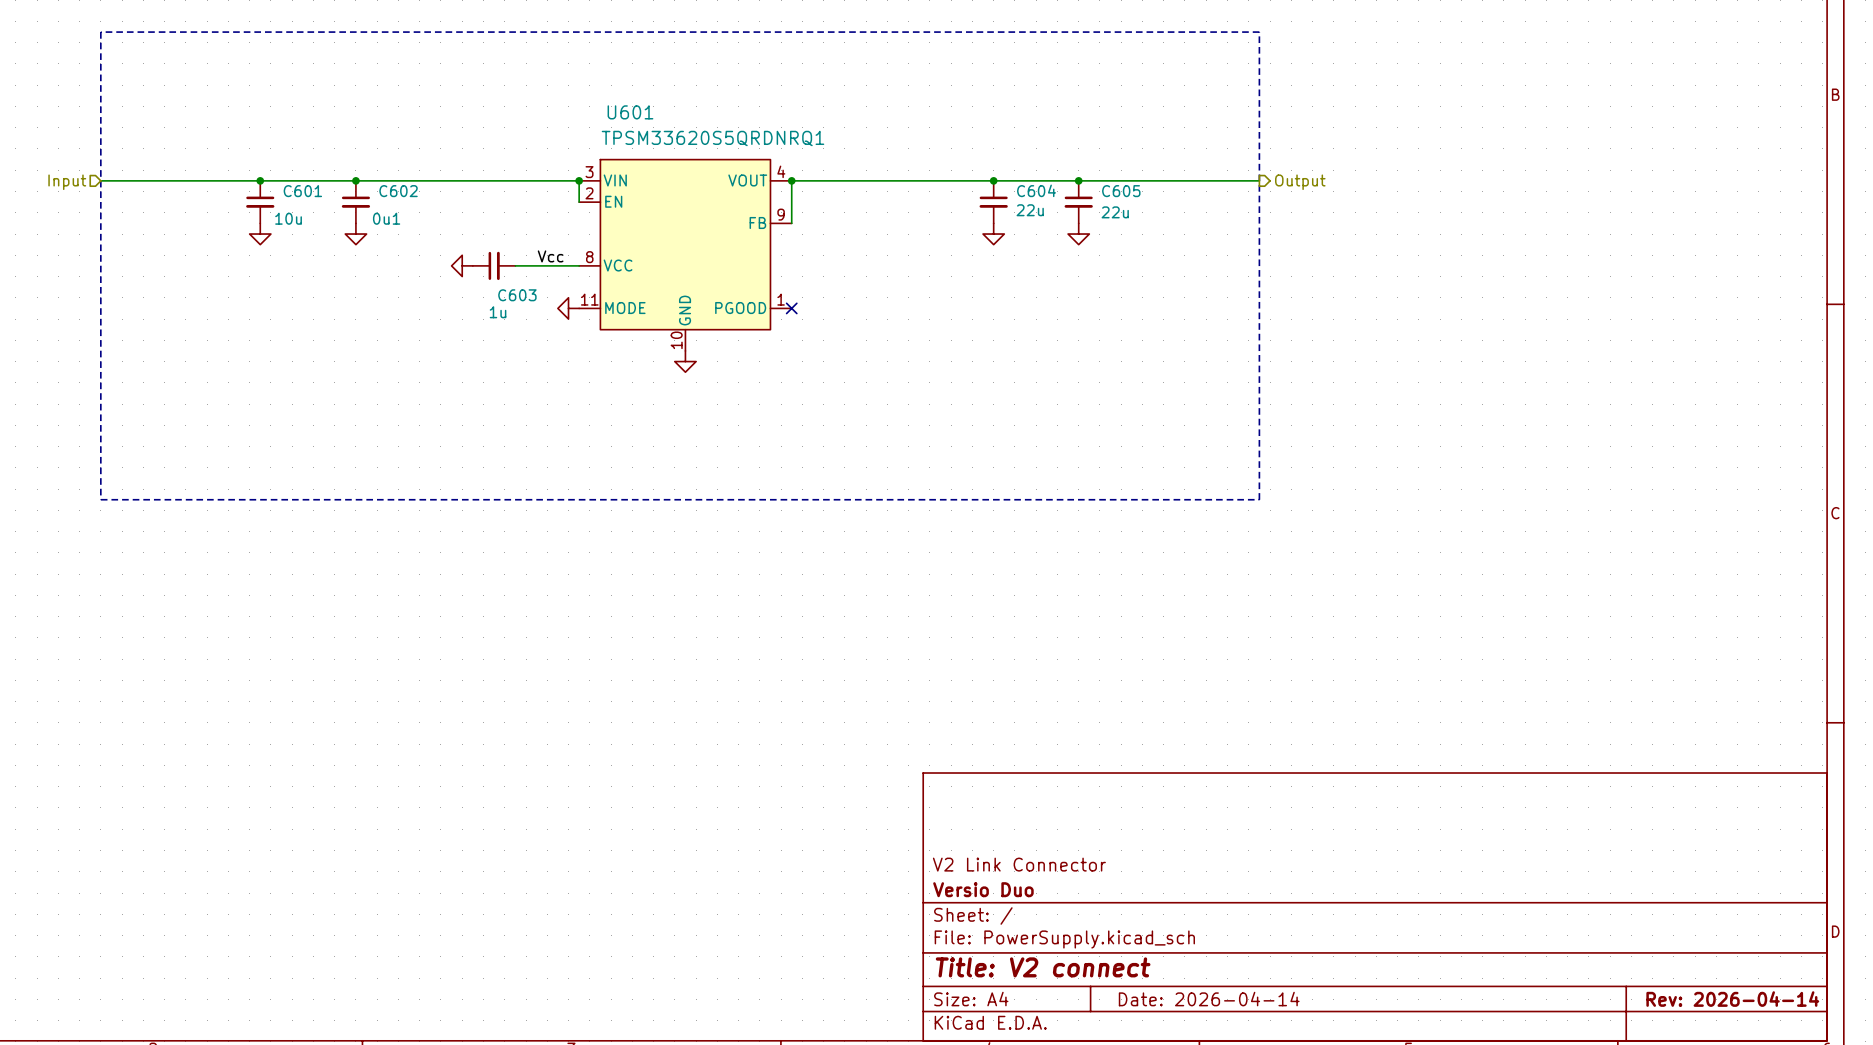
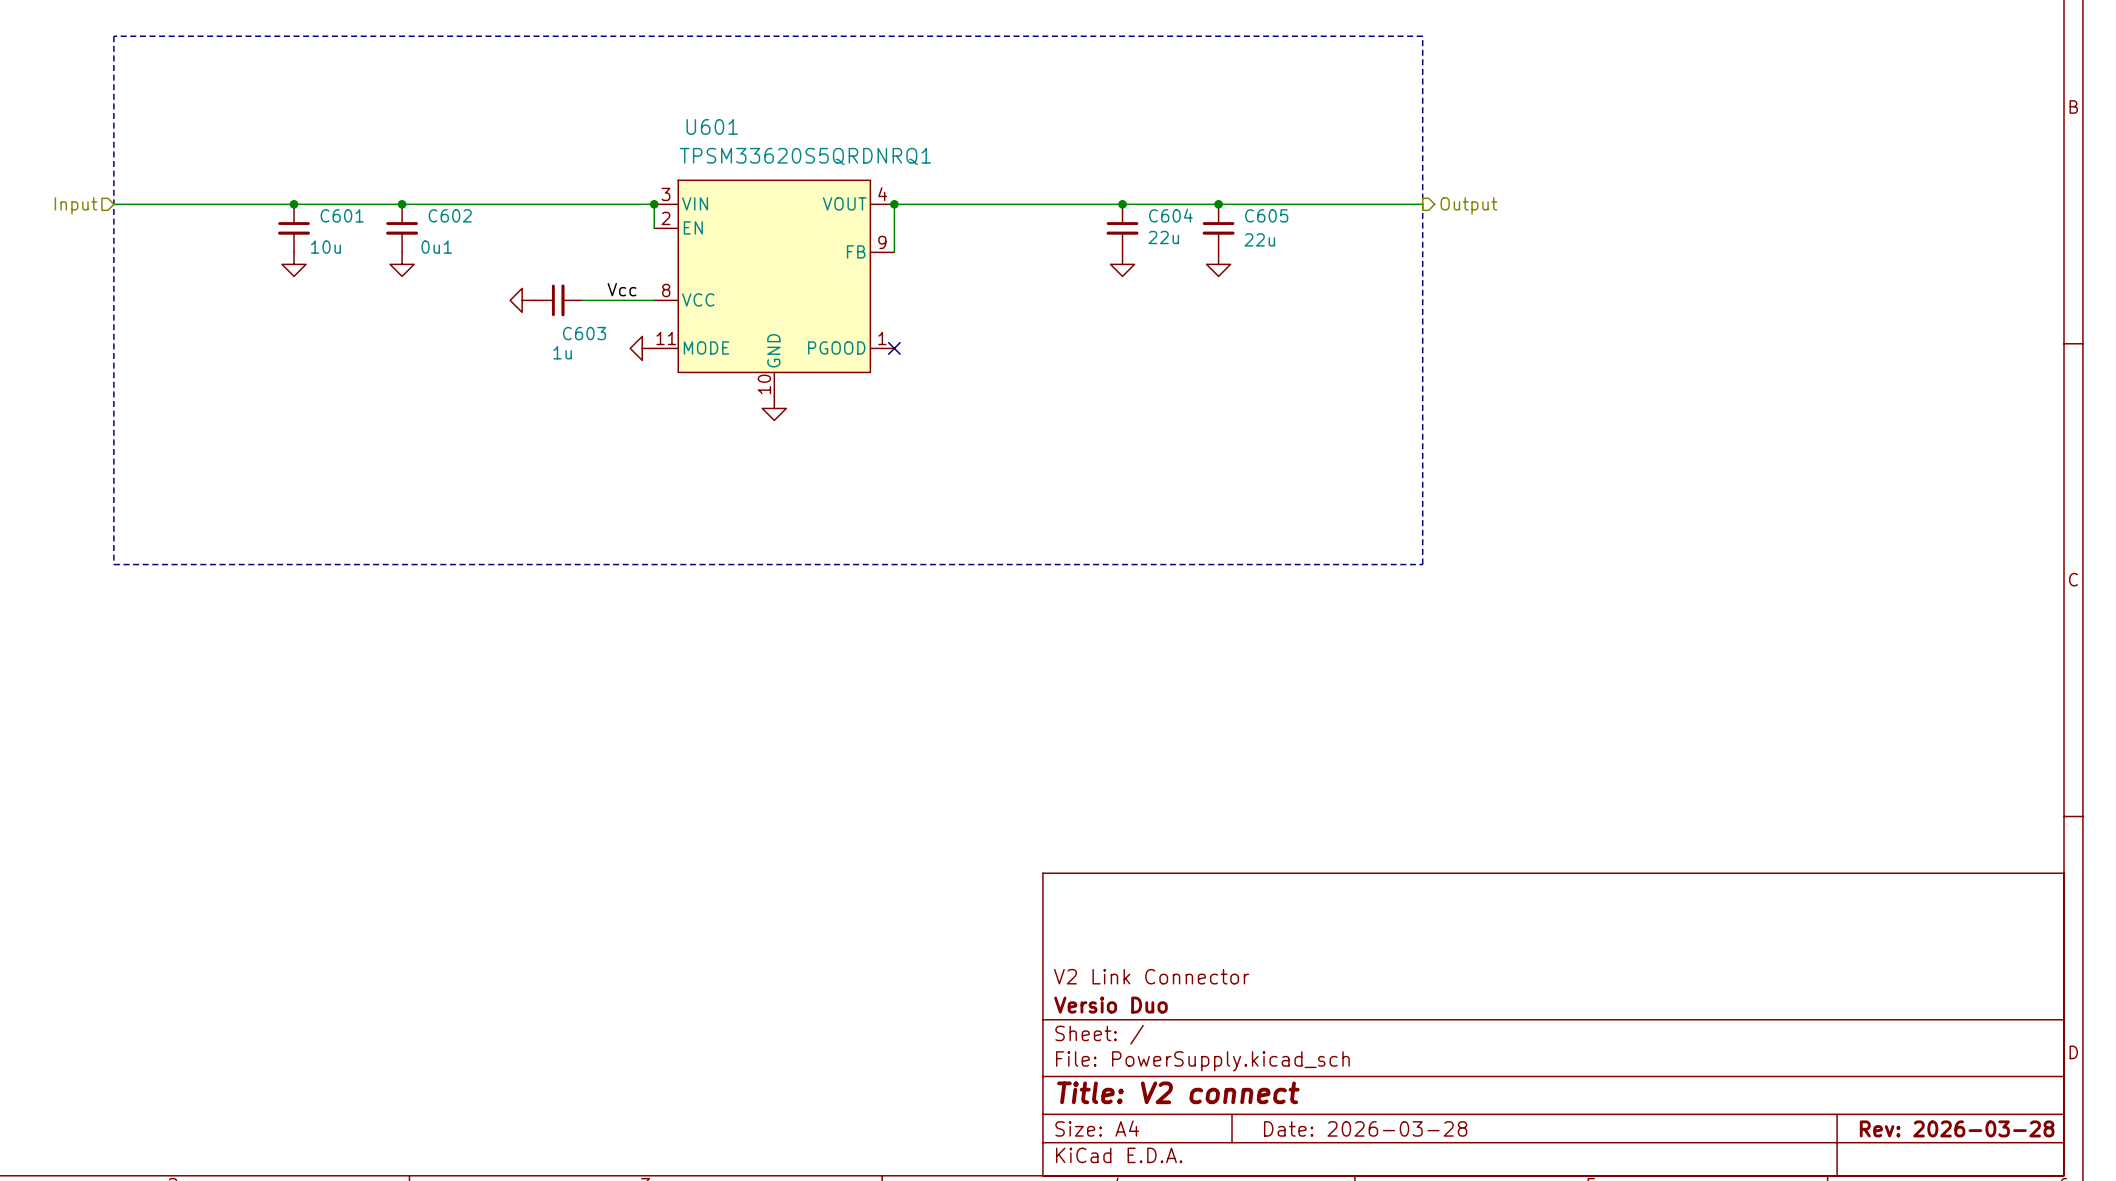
title block: Date: 2026-04-14 (1209, 999) -> Date: 2026-03-28 (1365, 1128)
title block: Rev: 2026-04-14 (1732, 999) -> Rev: 2026-03-28 (1957, 1128)

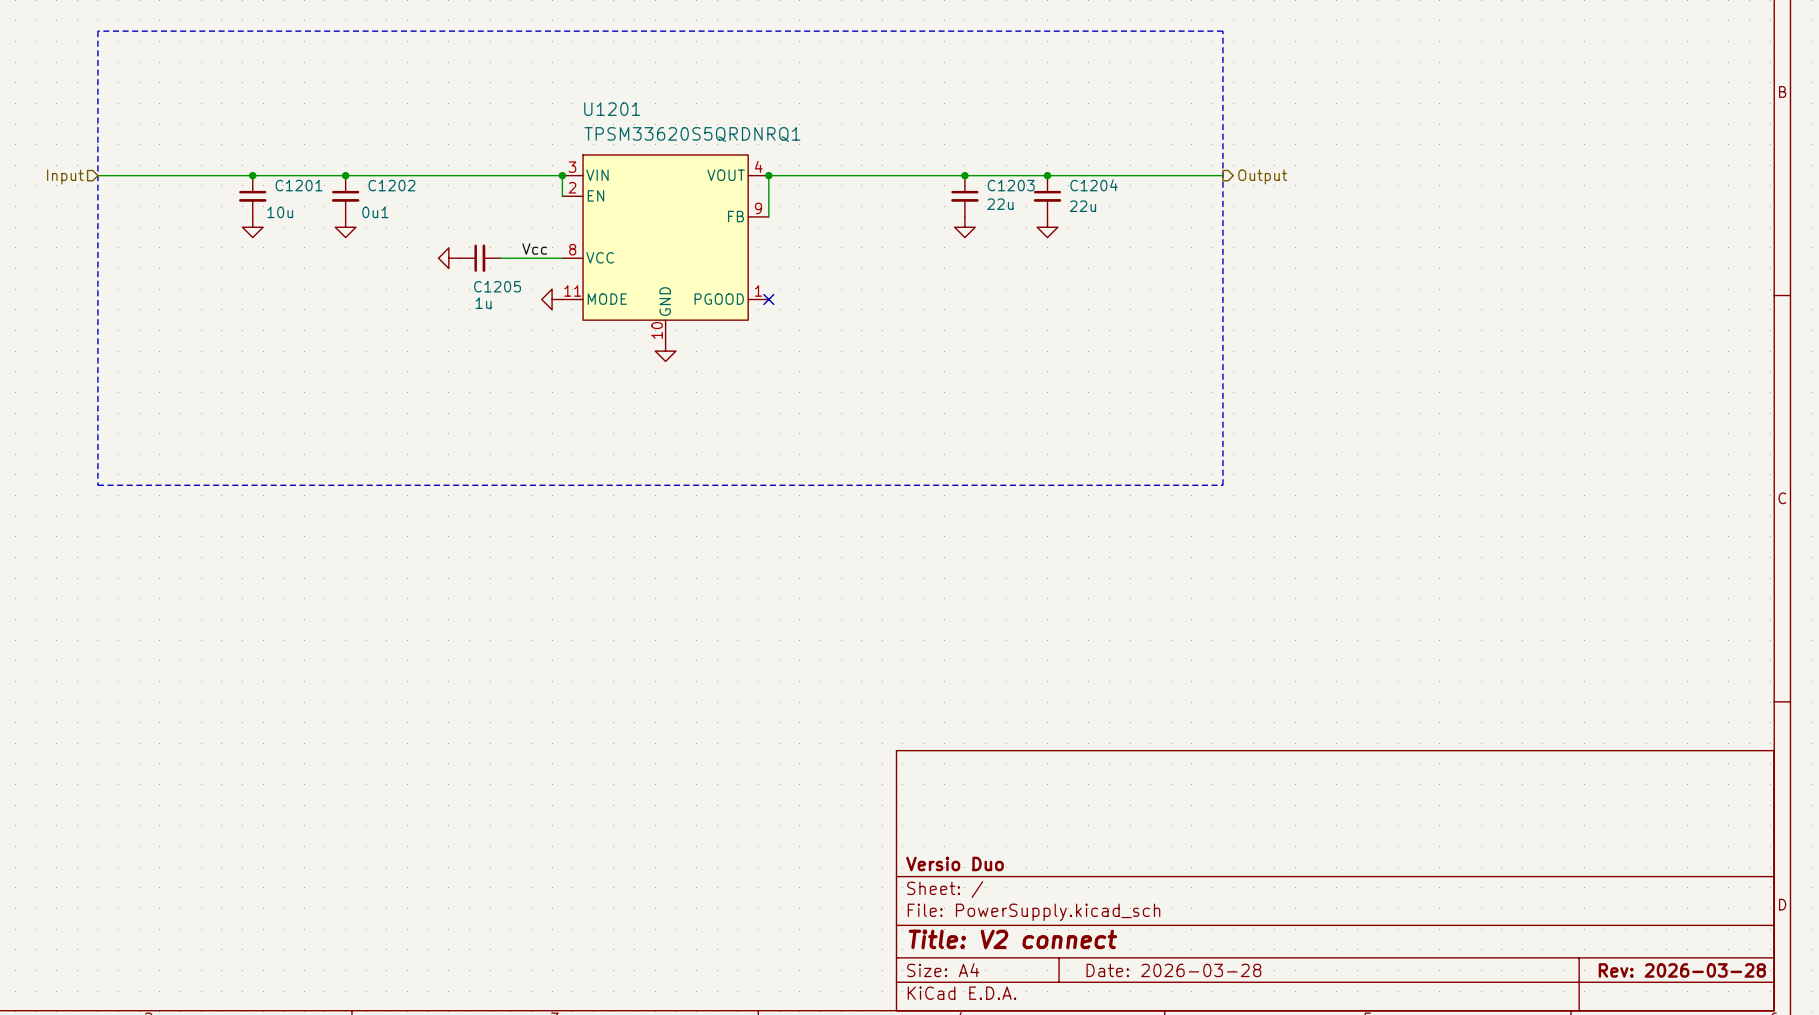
U601 name: U601 (712, 126) -> U1201 (612, 109)
C601 name: C601 (342, 215) -> C1201 (299, 185)
C602 name: C602 (450, 215) -> C1202 (391, 185)
C604 name: C604 (1170, 215) -> C1203 (1011, 185)
C605 name: C605 (1266, 215) -> C1204 (1094, 185)
C603 name: C603 (584, 333) -> C1205 (497, 286)
title block: V2 Link Connector (1151, 976) -> none

